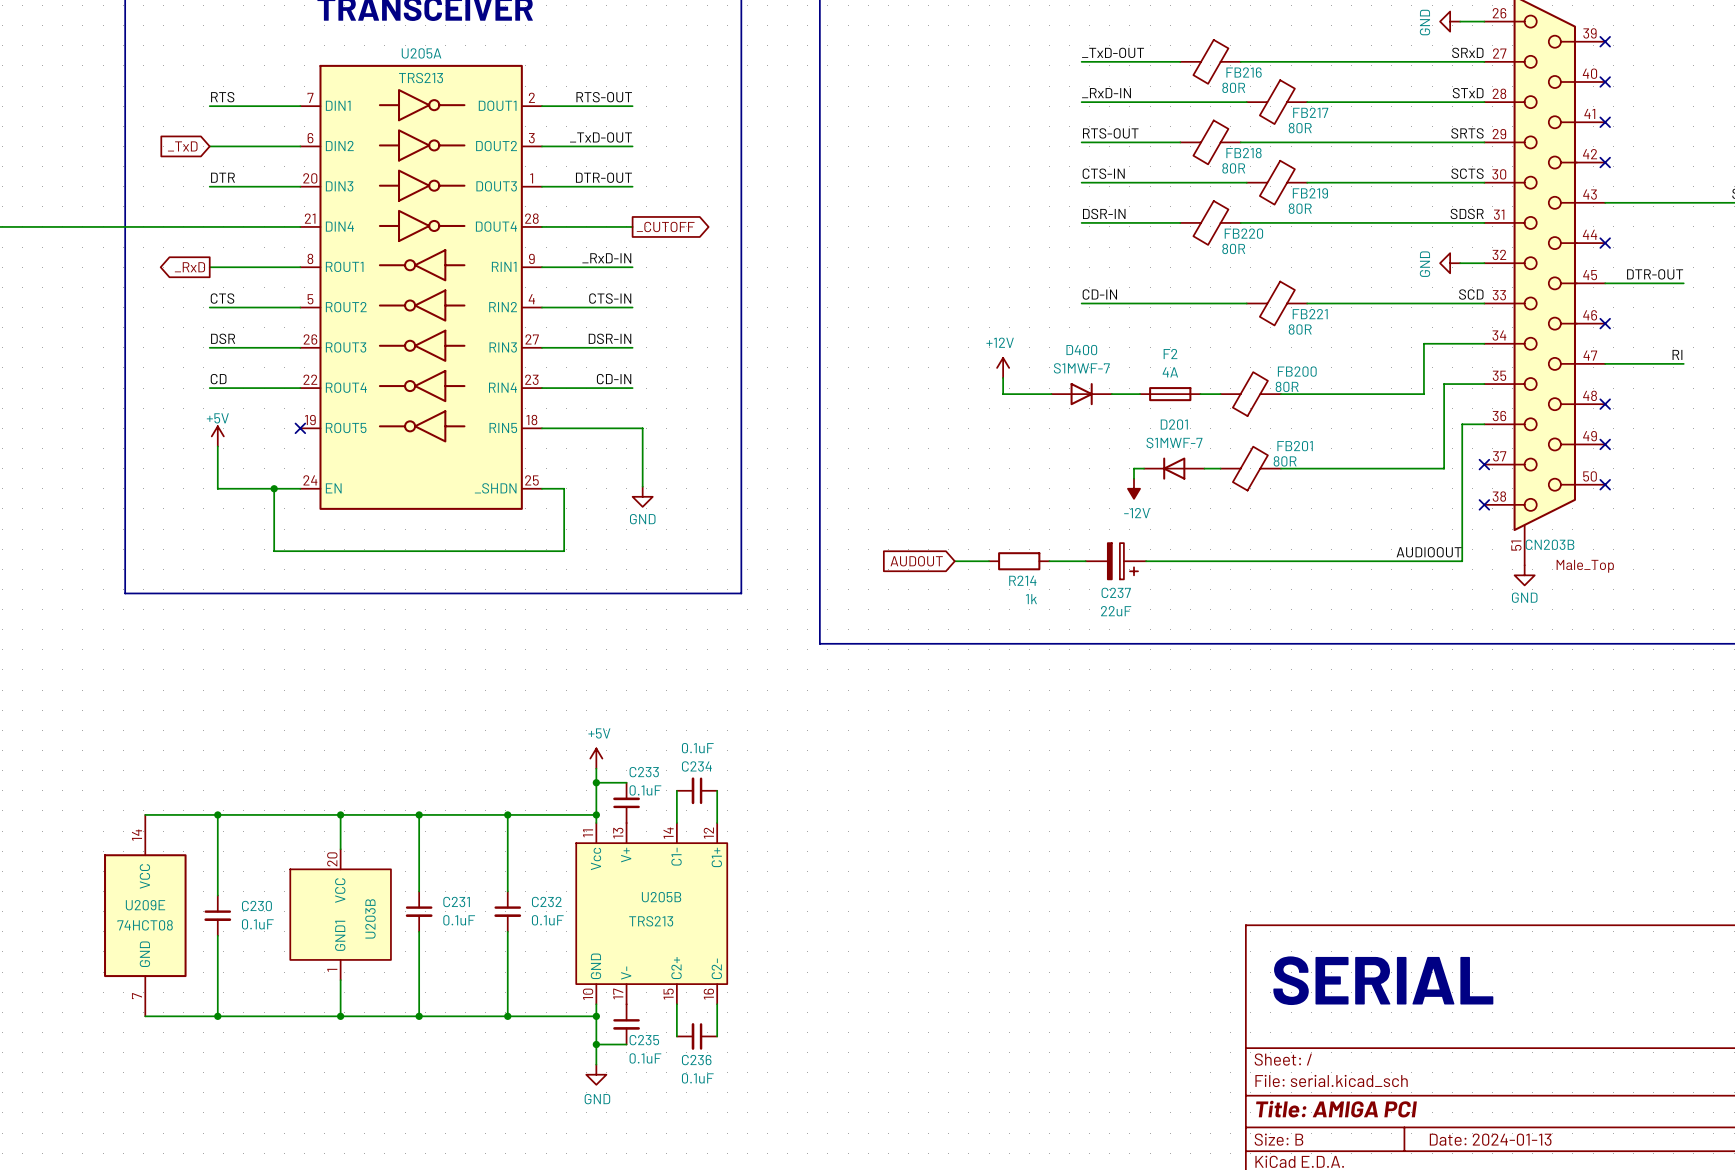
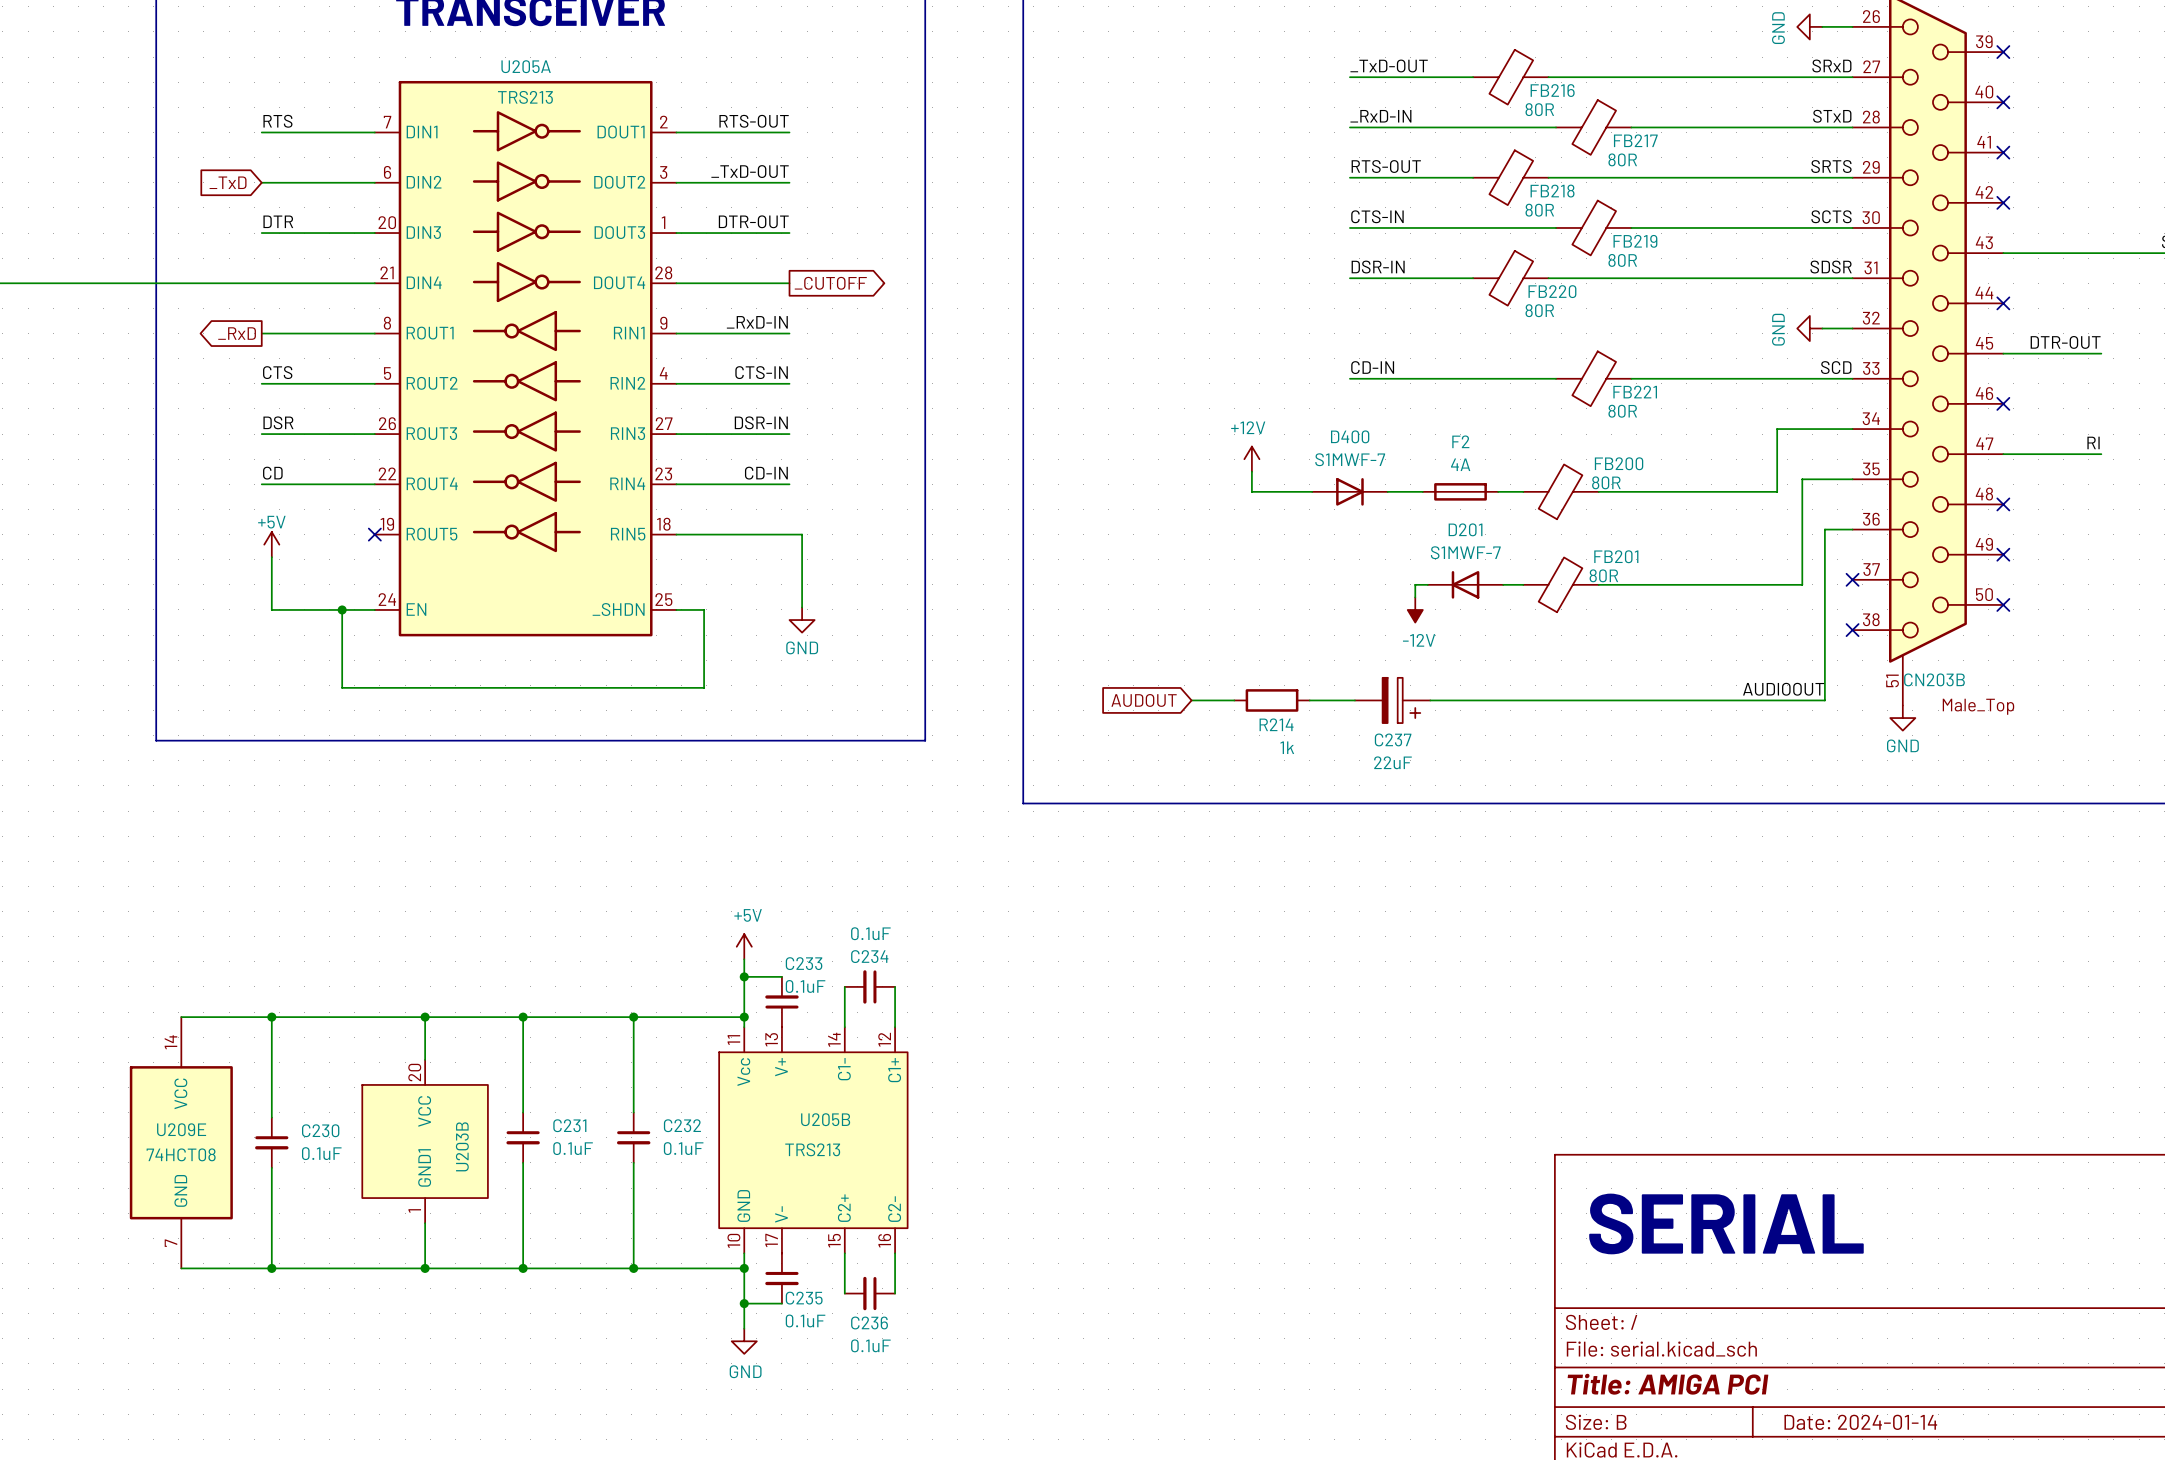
title block: Date: 2024-01-13 (1490, 1139) -> Date: 2024-01-14 (1860, 1422)

